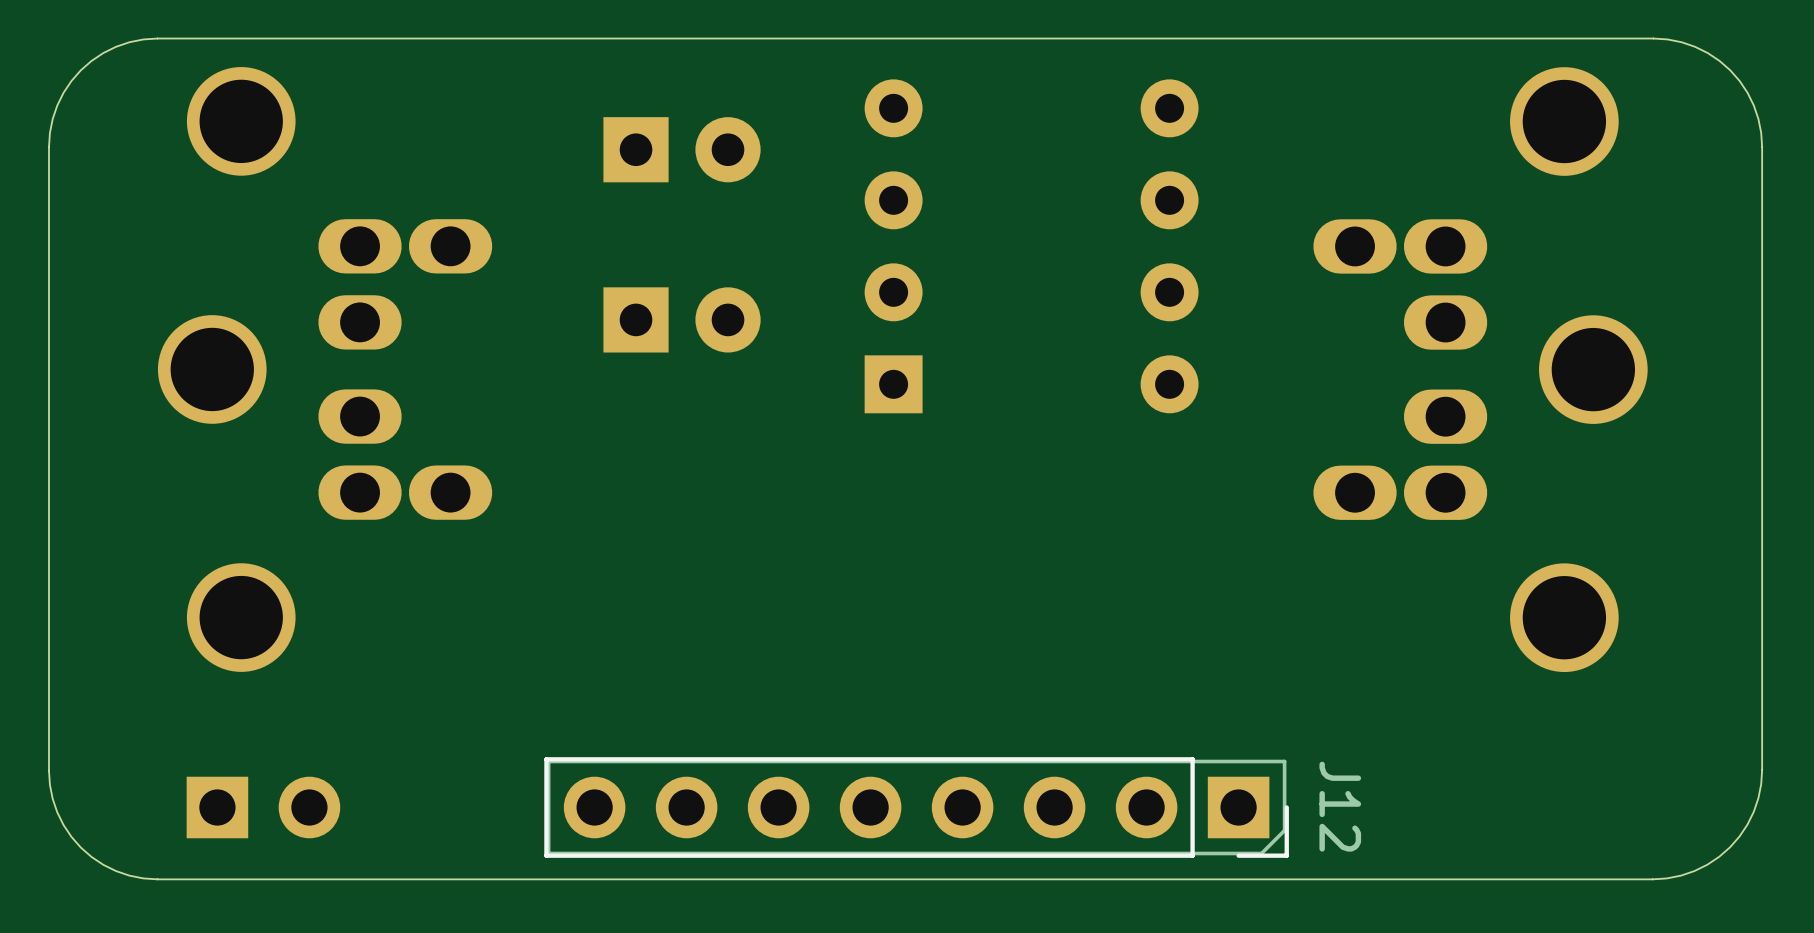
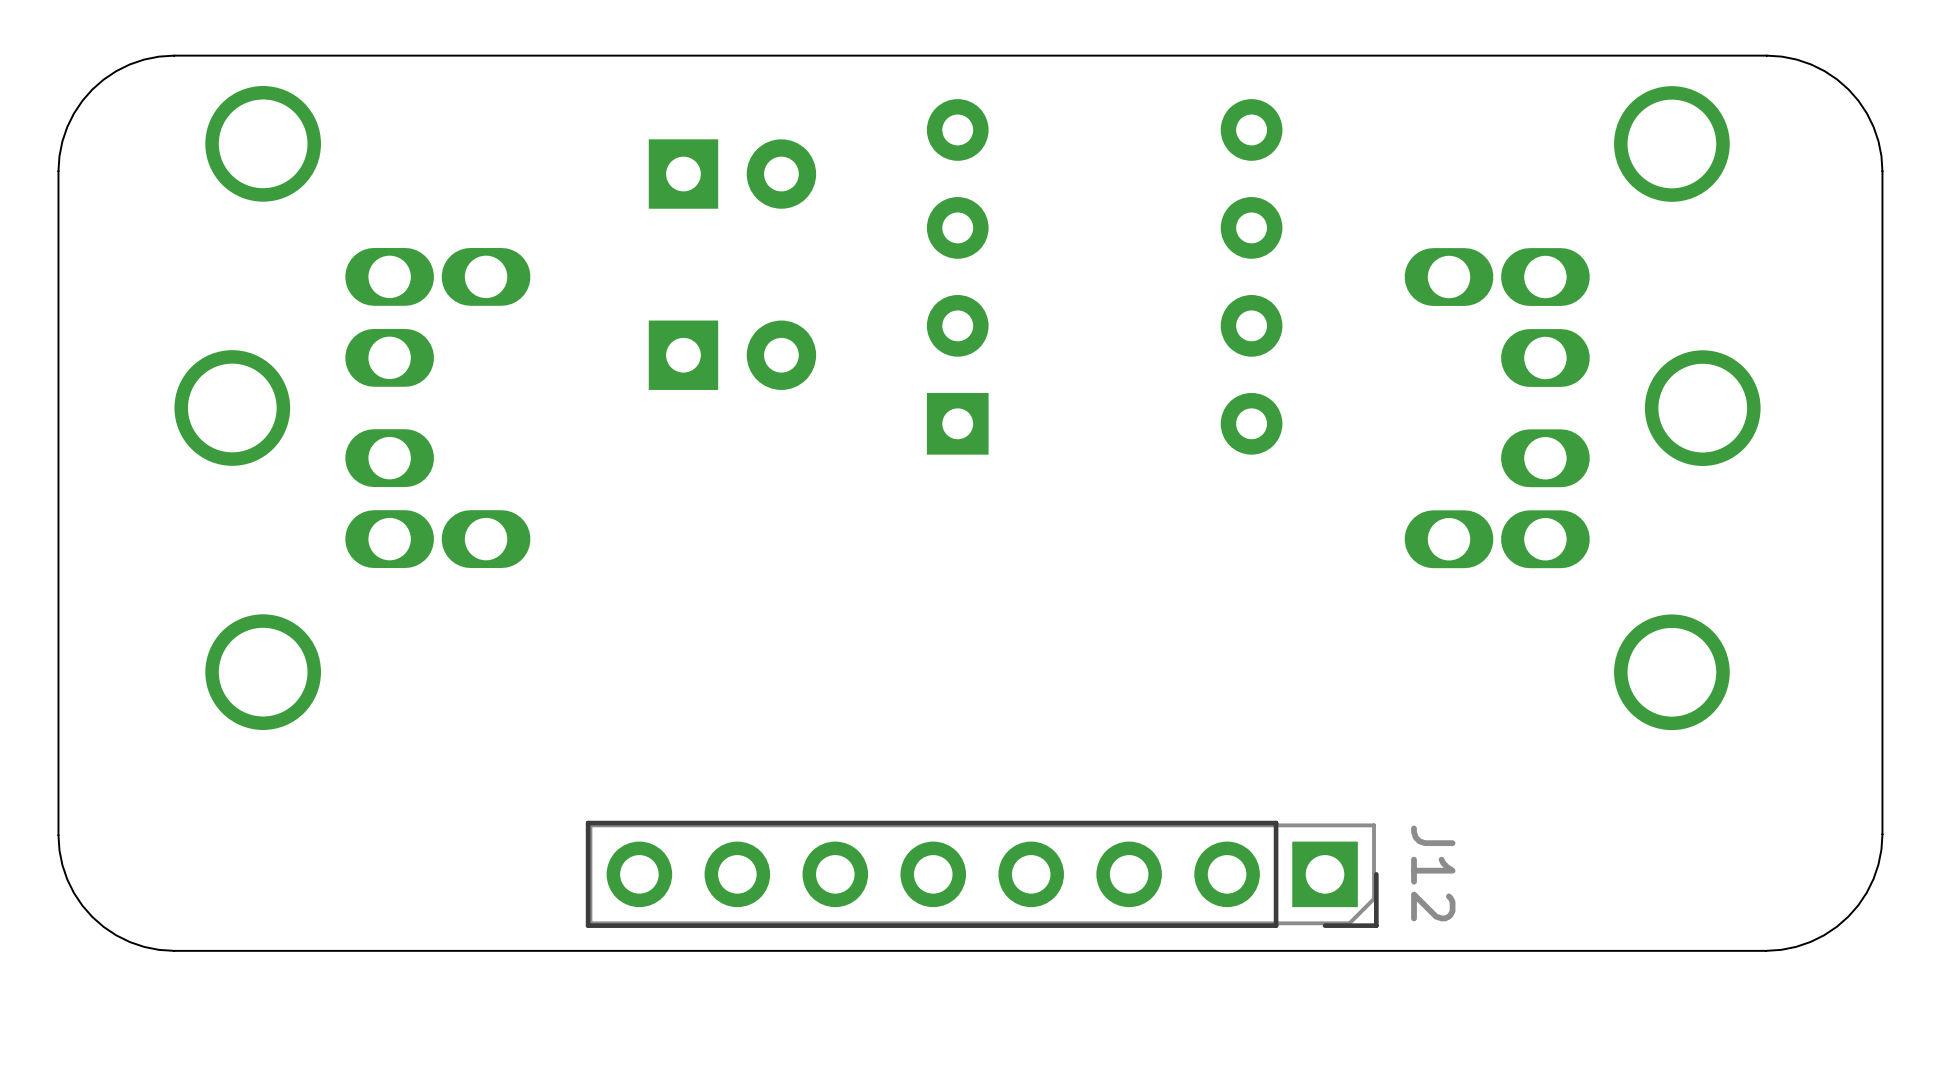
part: (263, 807) -> none

